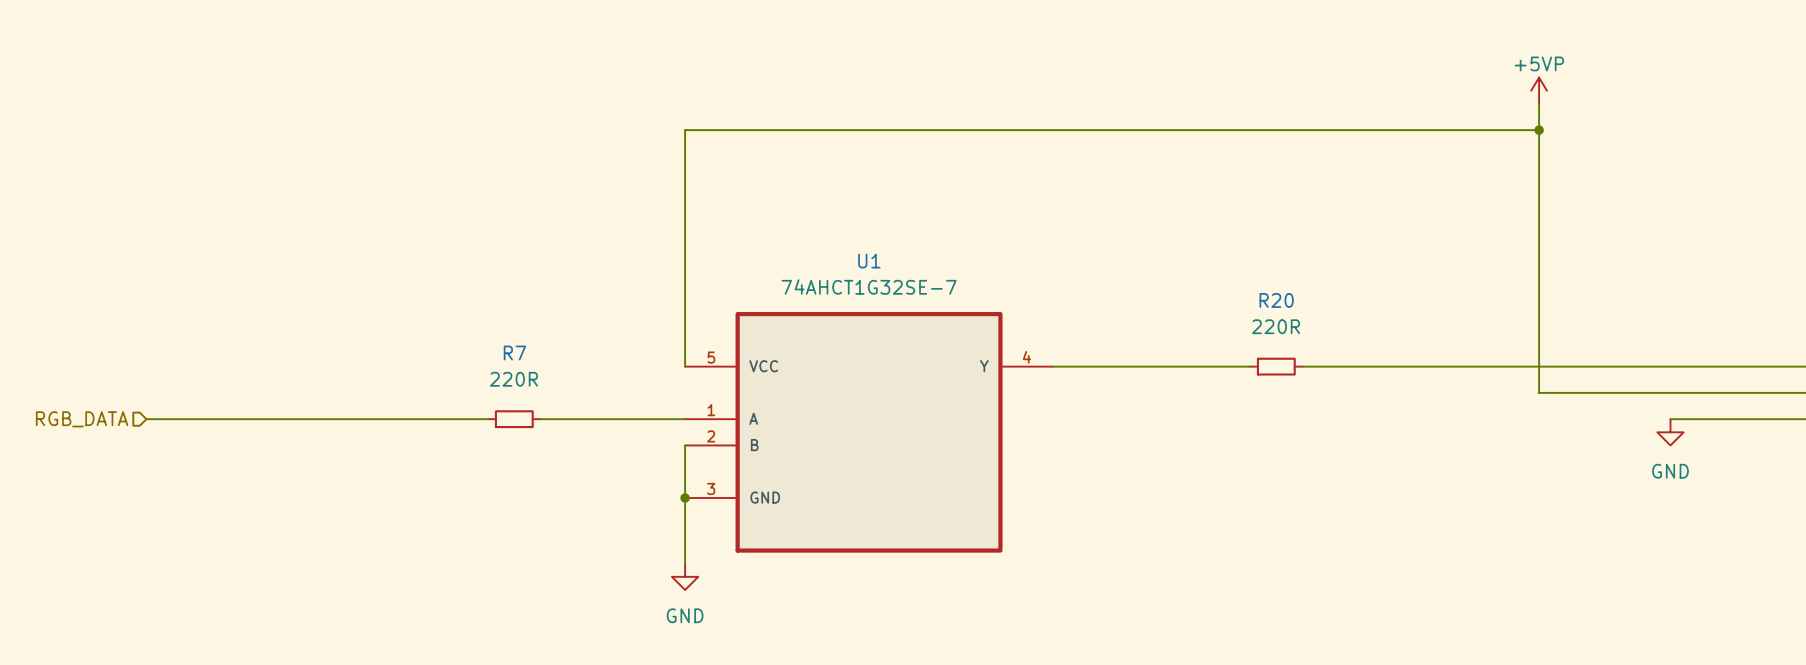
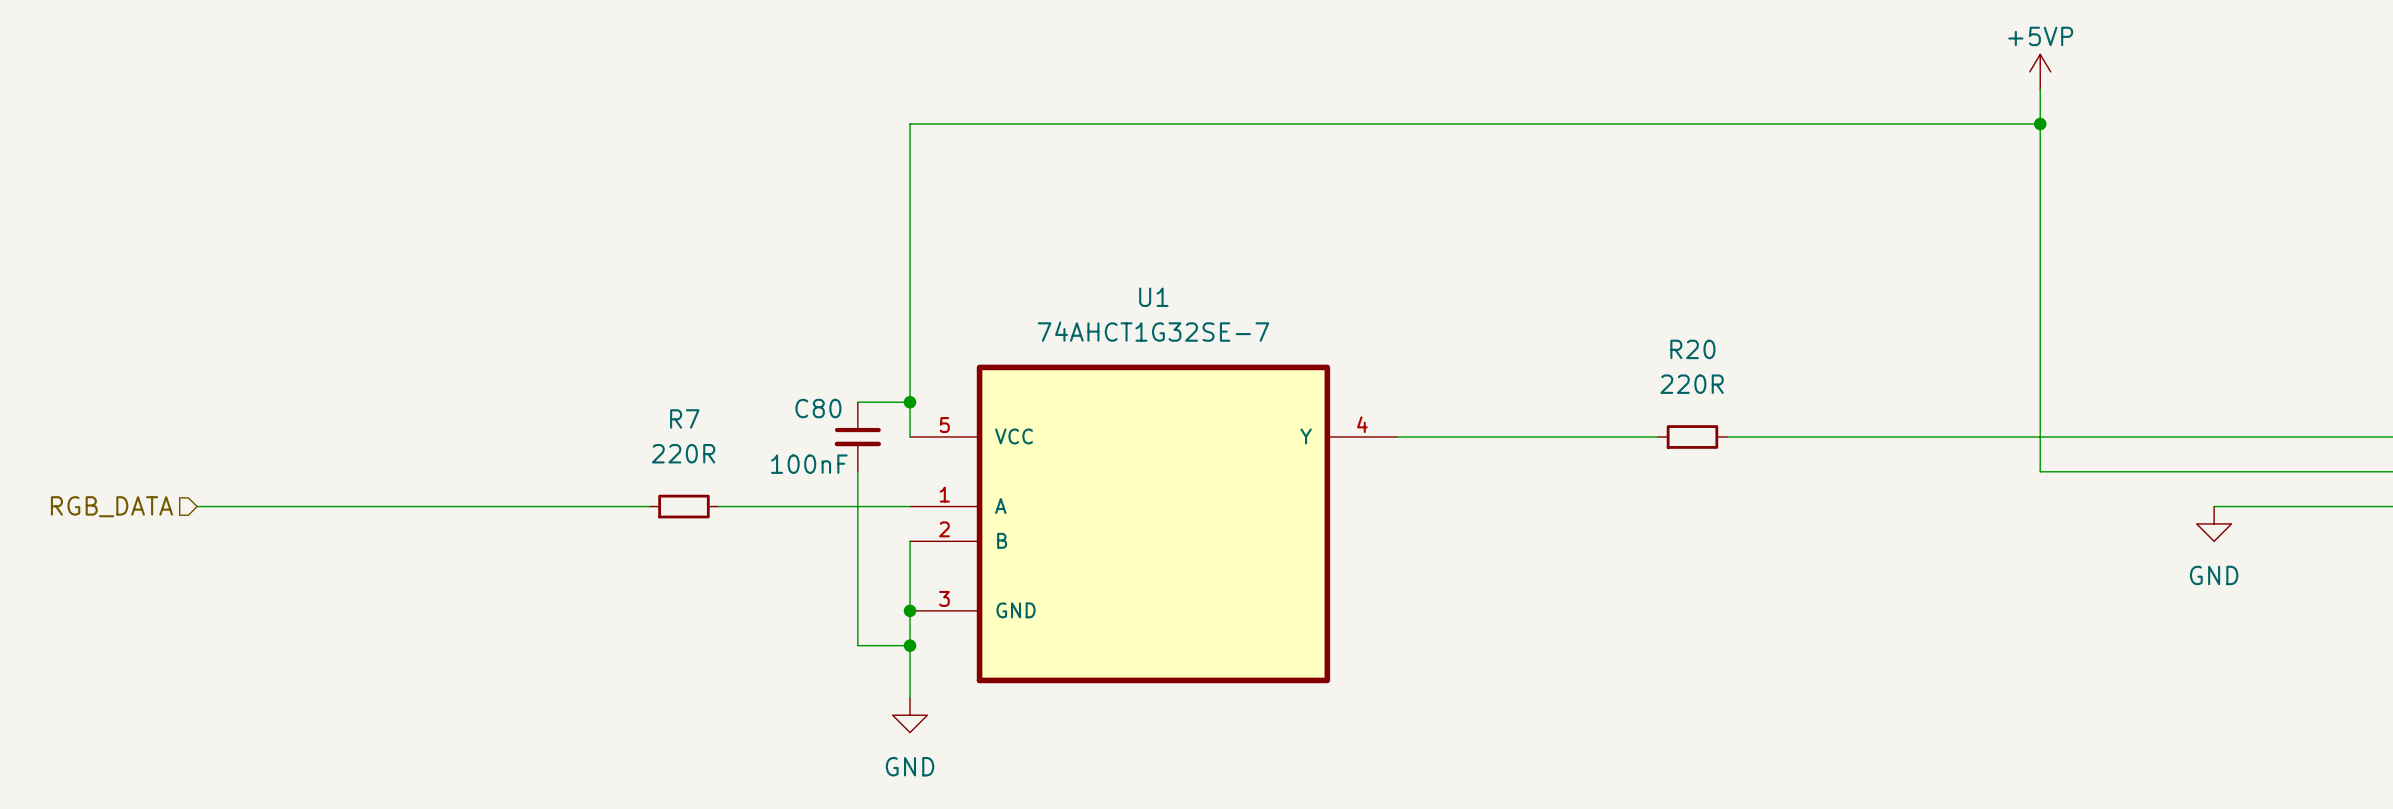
wire: none -> (857, 402) (910, 402)
junction: none -> (910, 402)
C80: none -> 100nF (857, 437)
wire: none -> (857, 471) (857, 645) (910, 645)
junction: none -> (910, 645)

